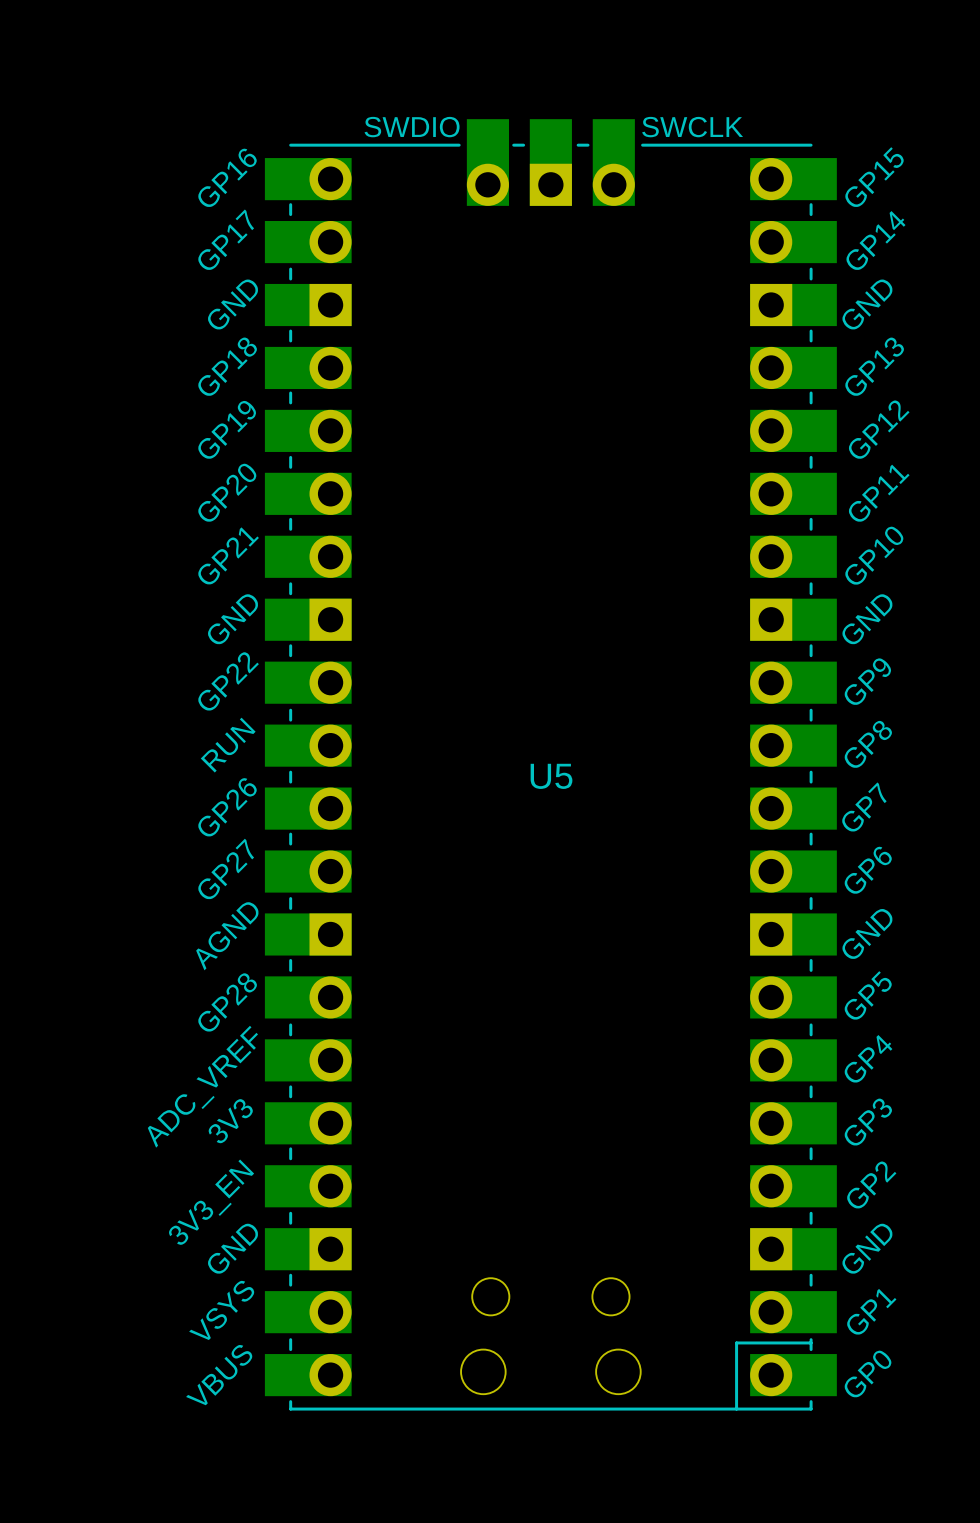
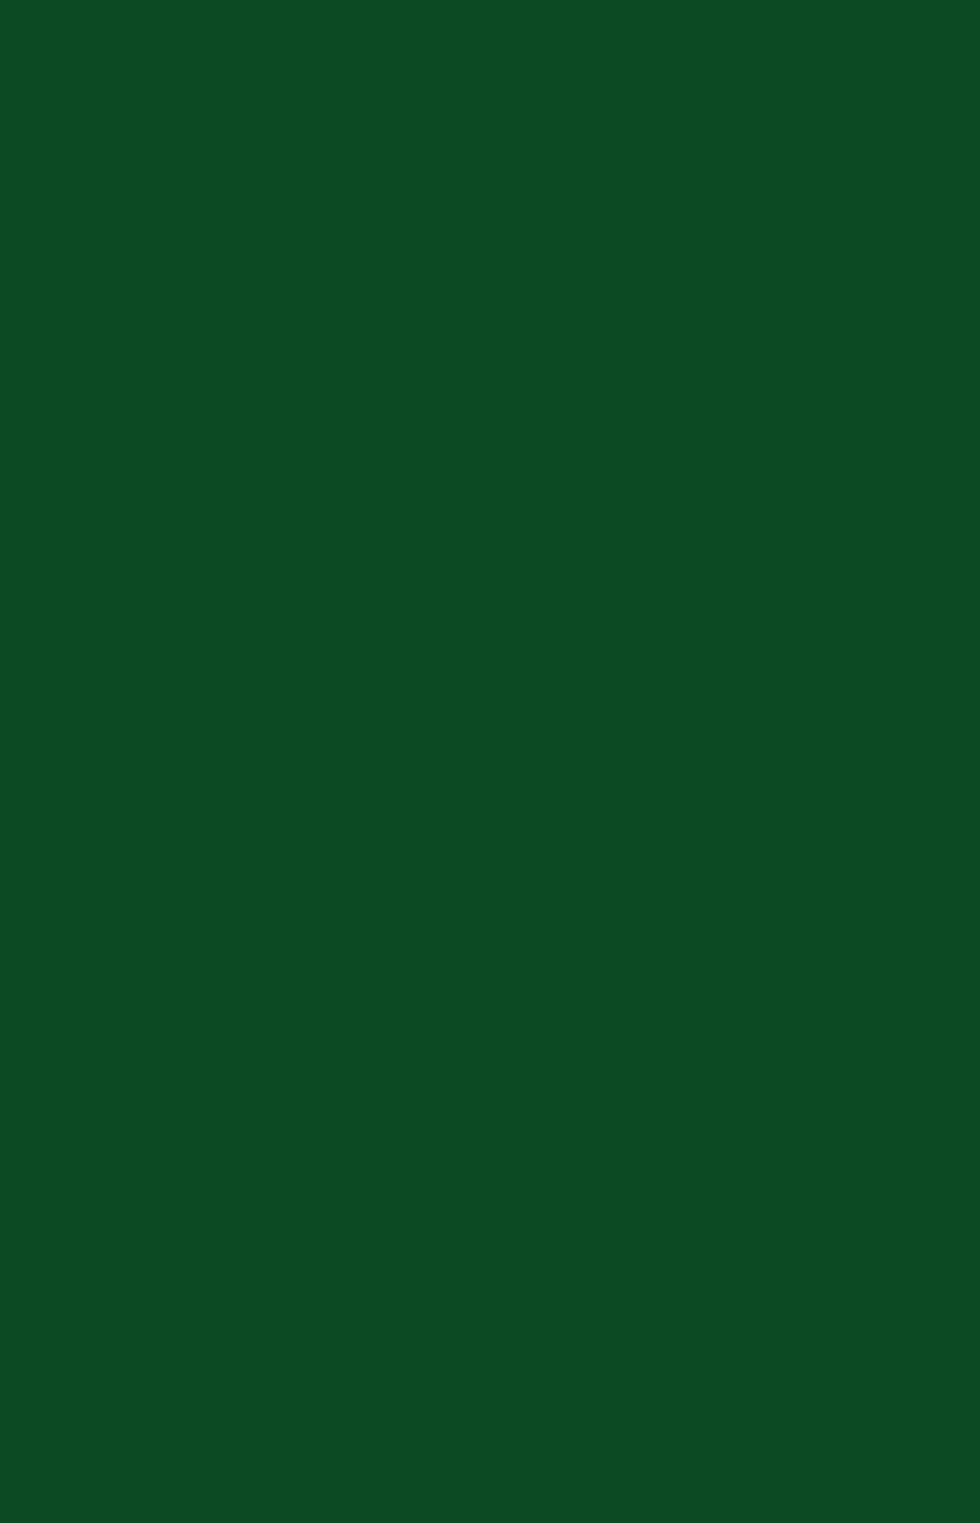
U5: (550, 764) -> none

